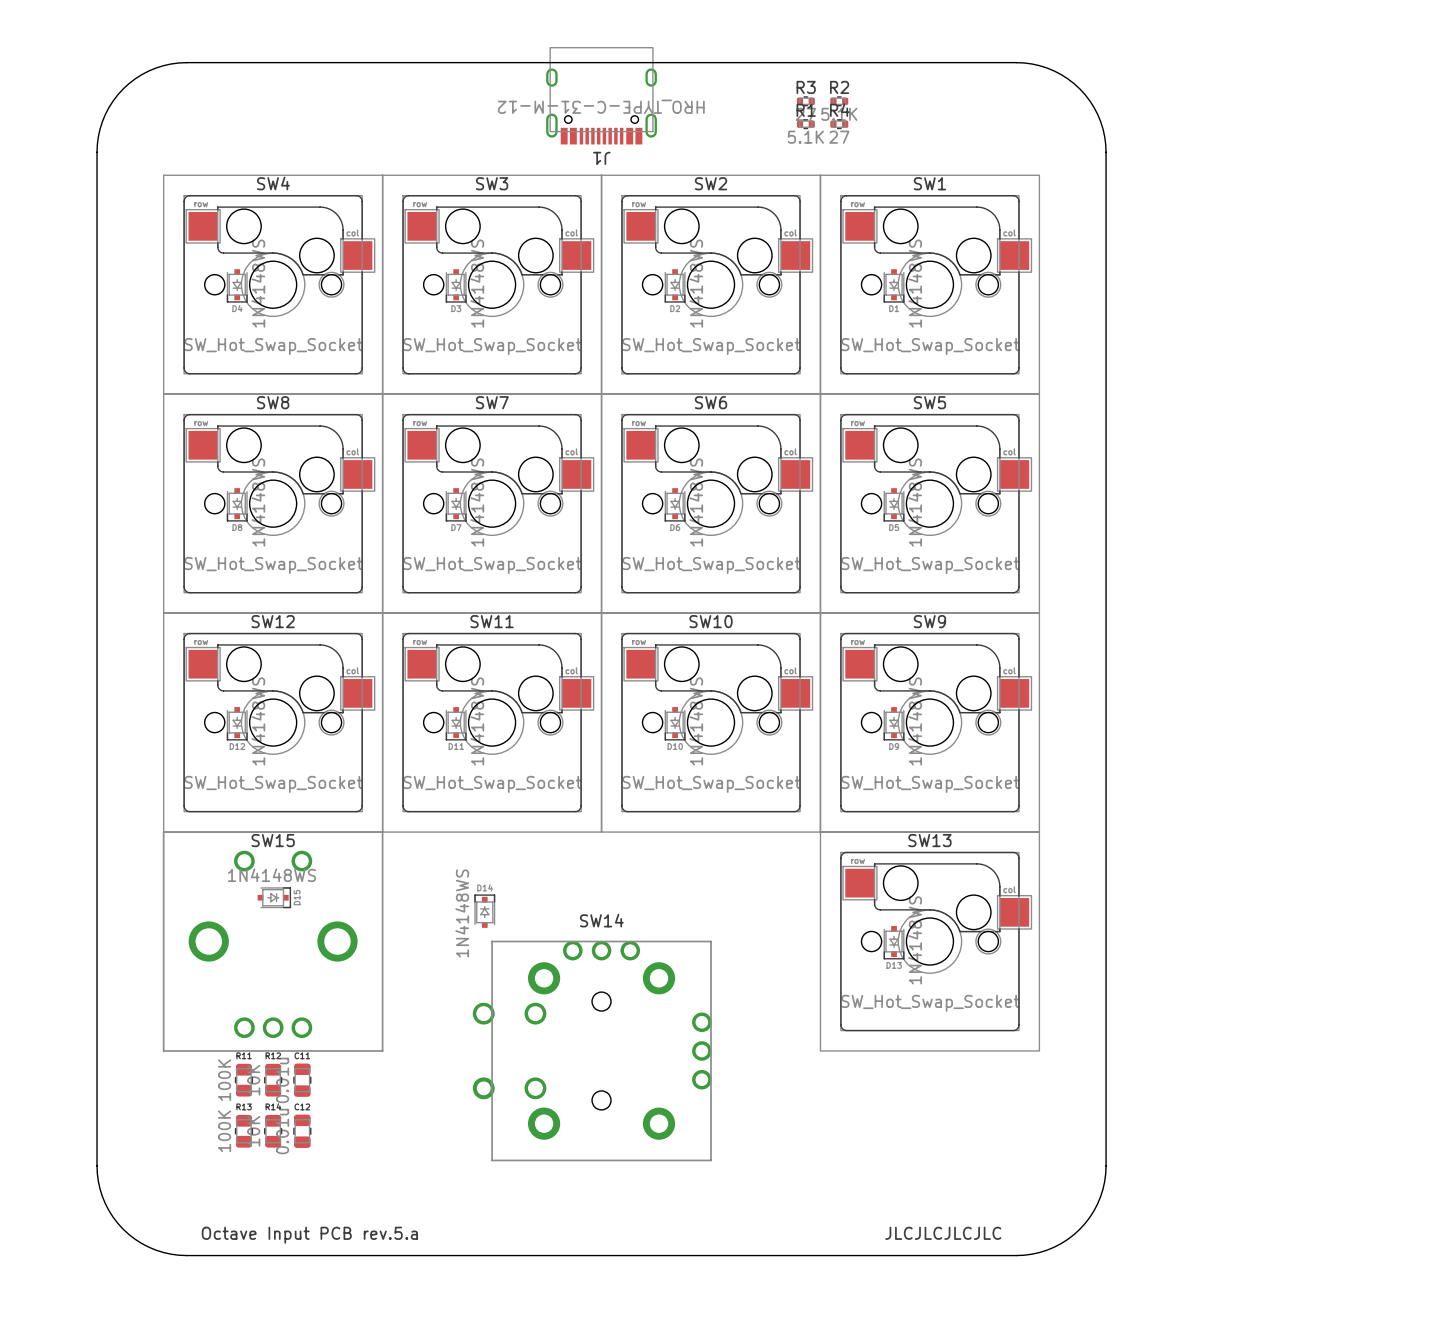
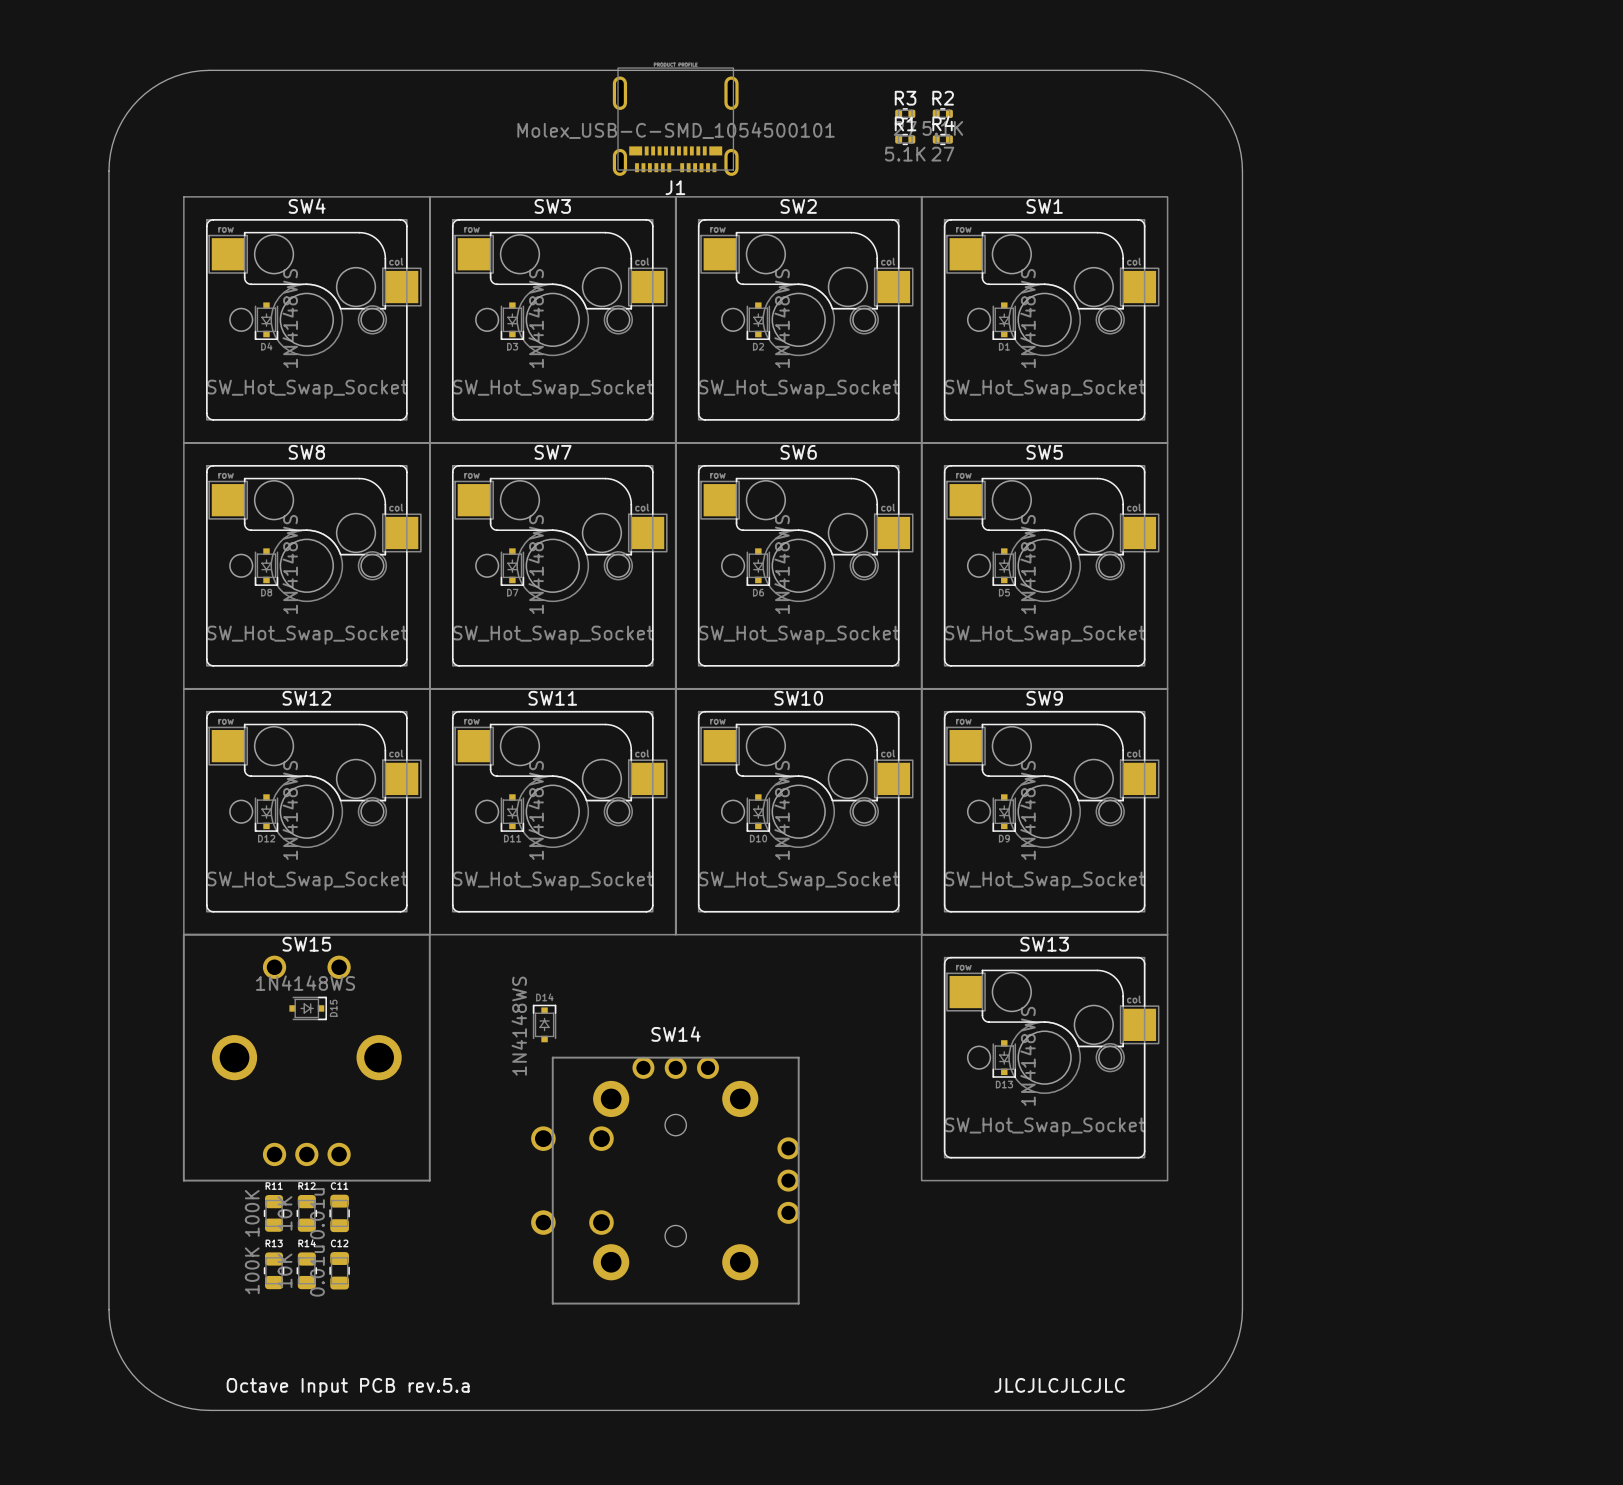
J1 footprint: [546, 47, 657, 145] -> [612, 67, 739, 176]
J1 value: HRO_TYPE-C-31-M-12 (601, 106) -> Molex_USB-C-SMD_1054500101 (676, 130)

